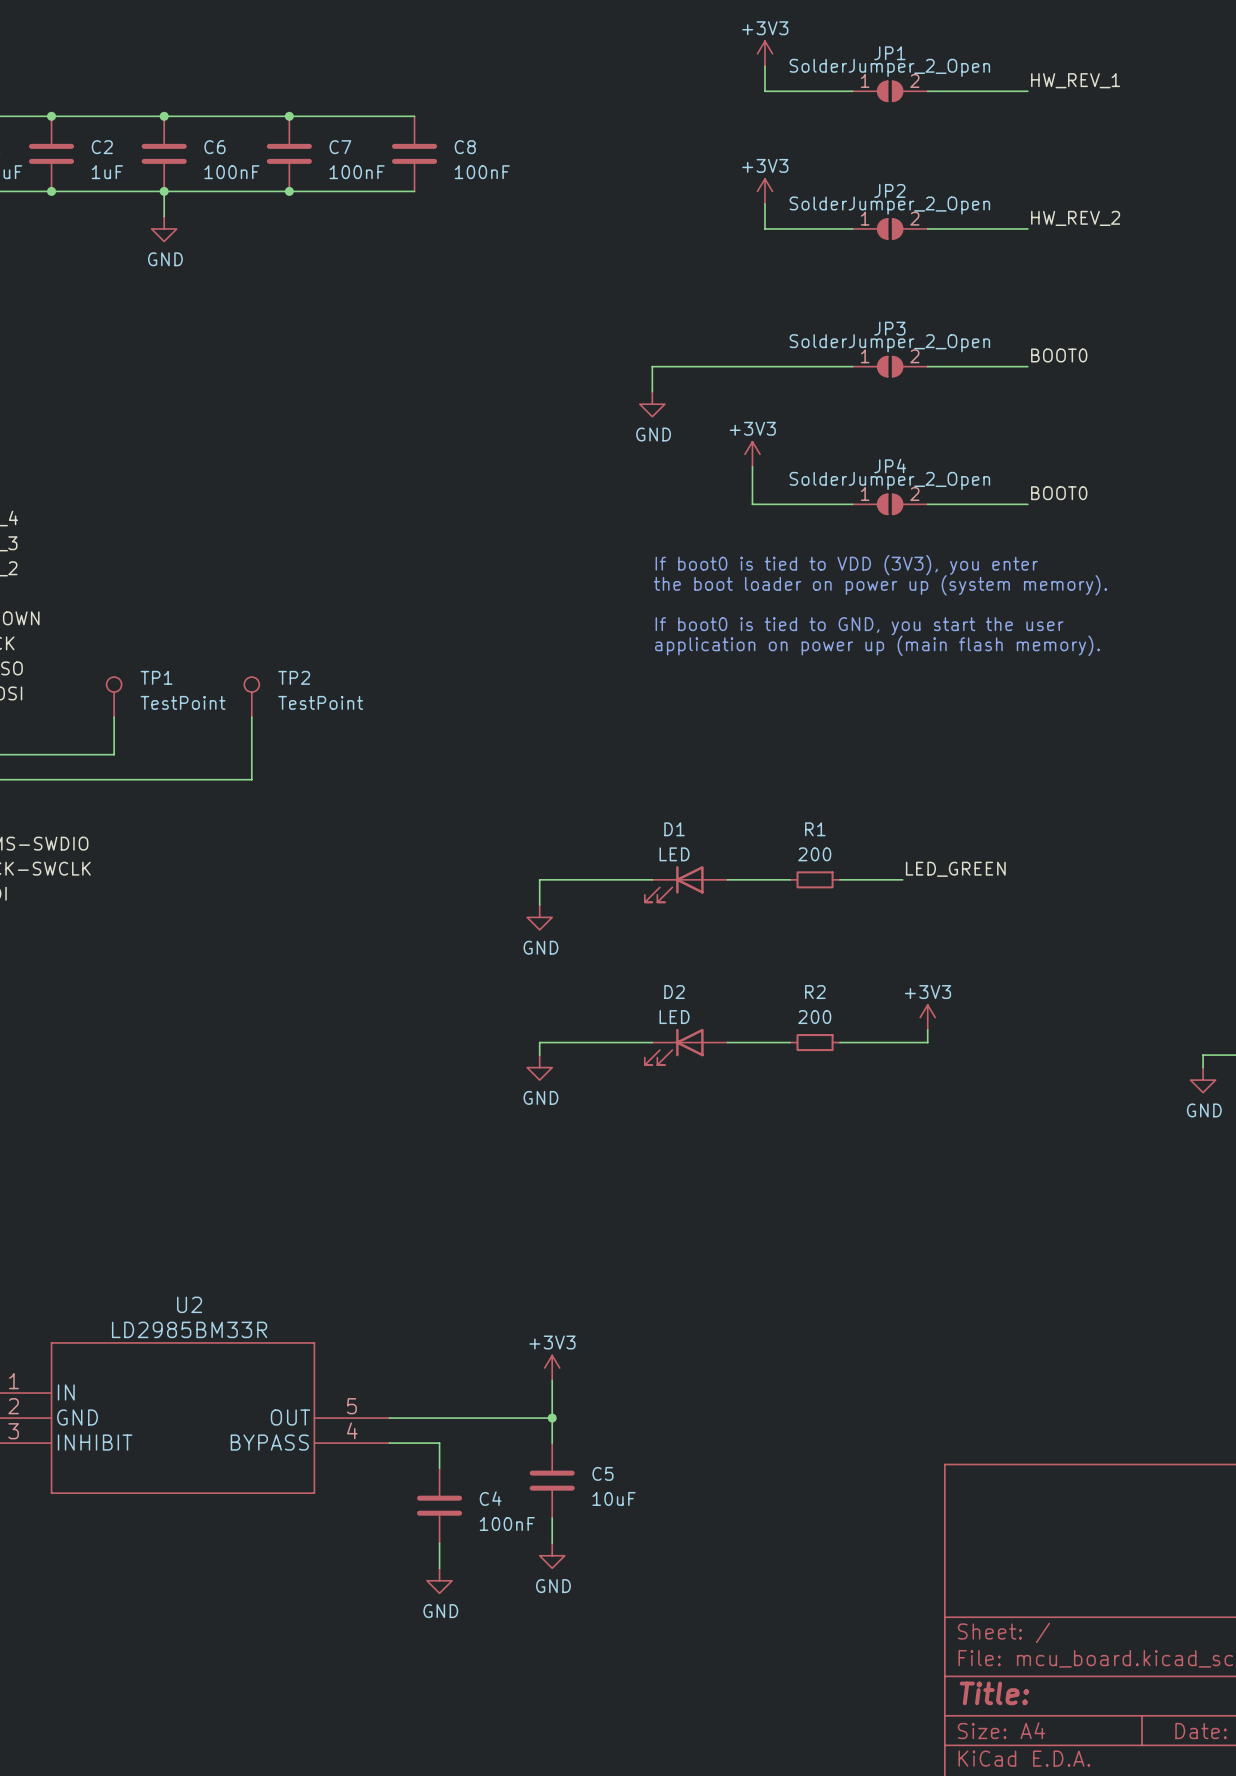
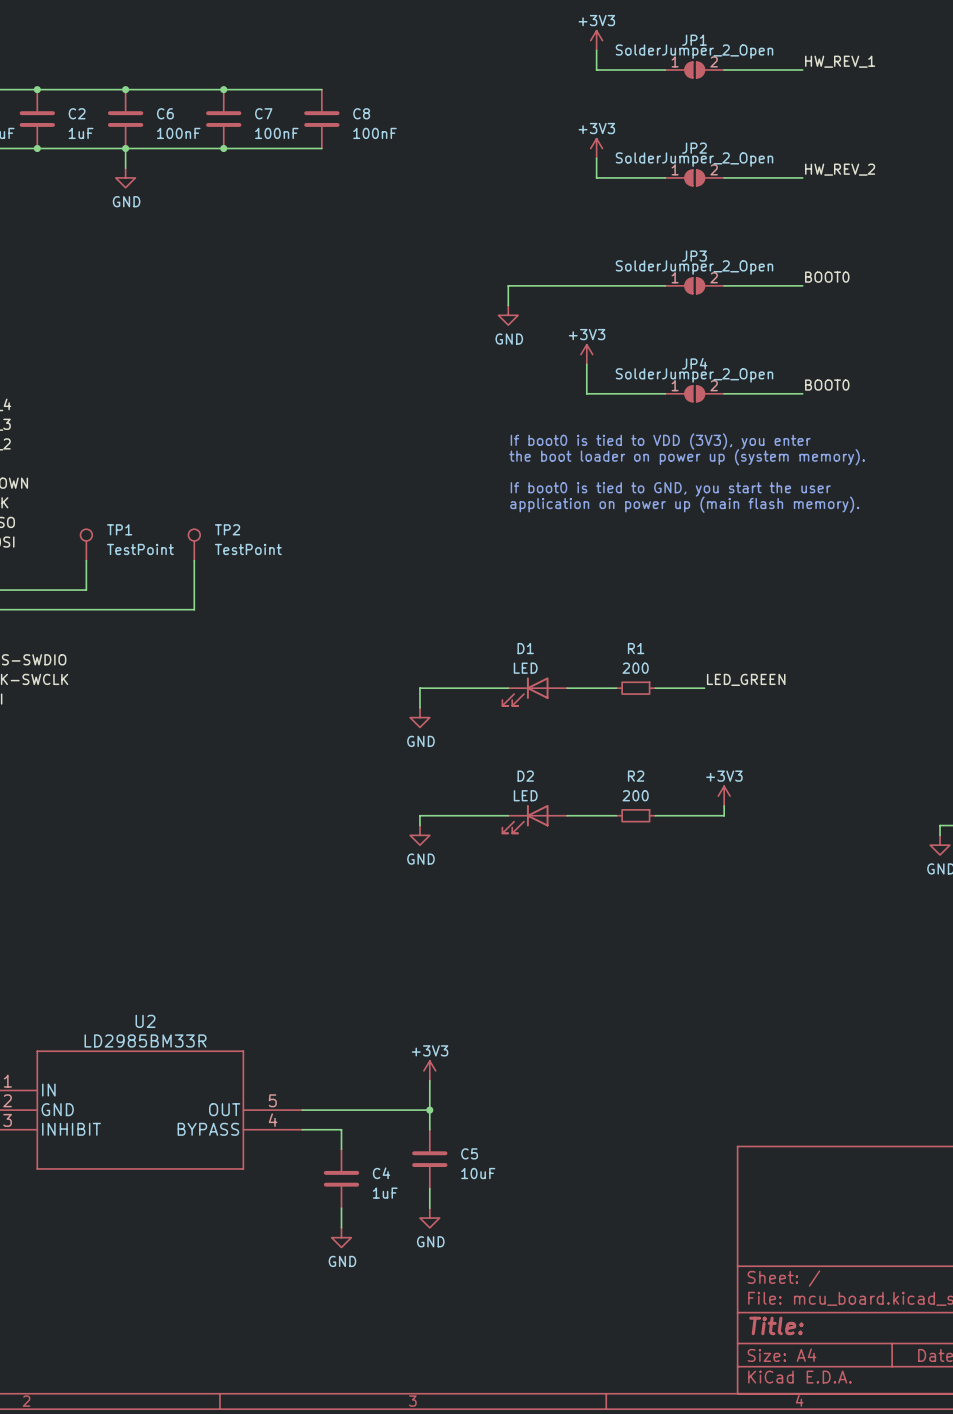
C4 value: 100nF (507, 1523) -> 1uF (385, 1193)

